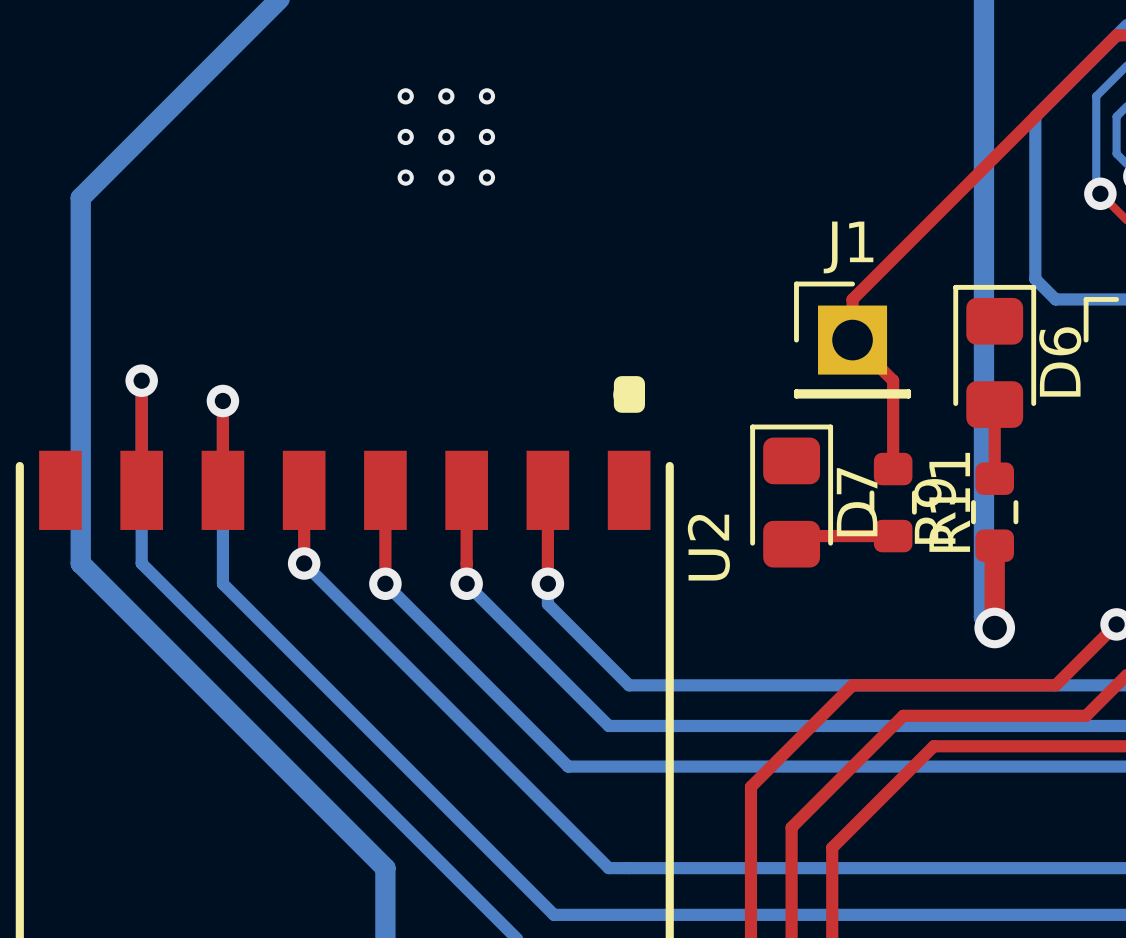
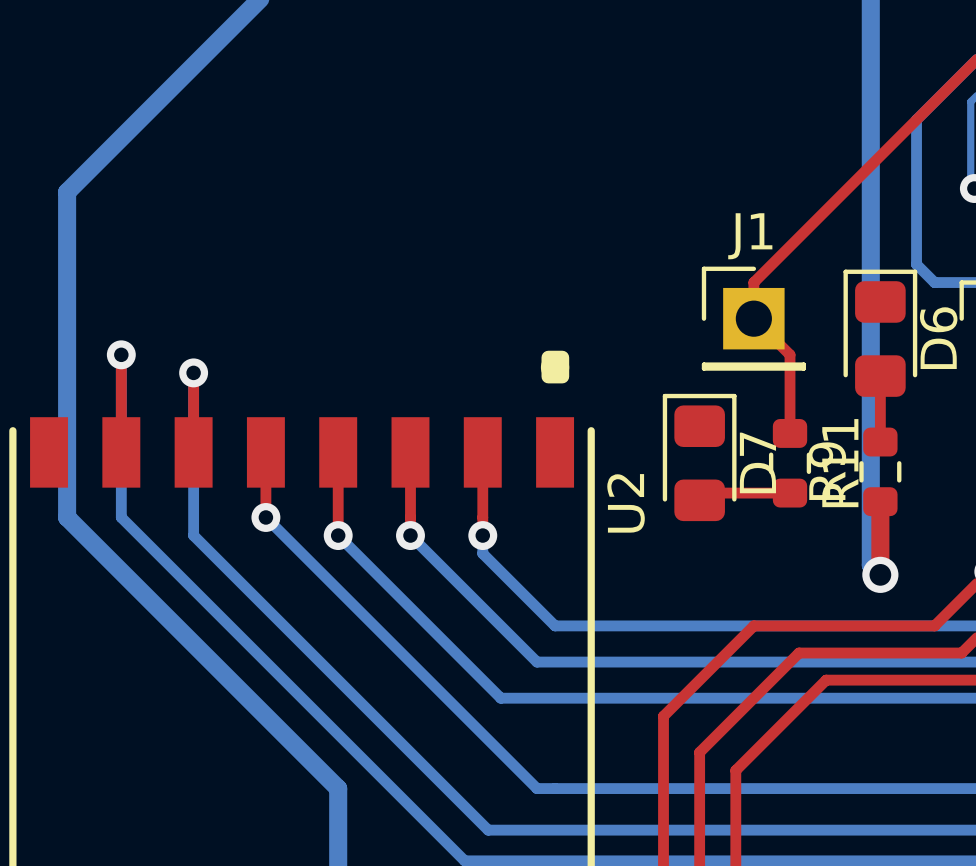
via: (405, 96) -> none
via: (446, 96) -> none
via: (486, 96) -> none
via: (405, 136) -> none
via: (446, 136) -> none
via: (486, 136) -> none
via: (405, 177) -> none
via: (446, 177) -> none
via: (486, 177) -> none

